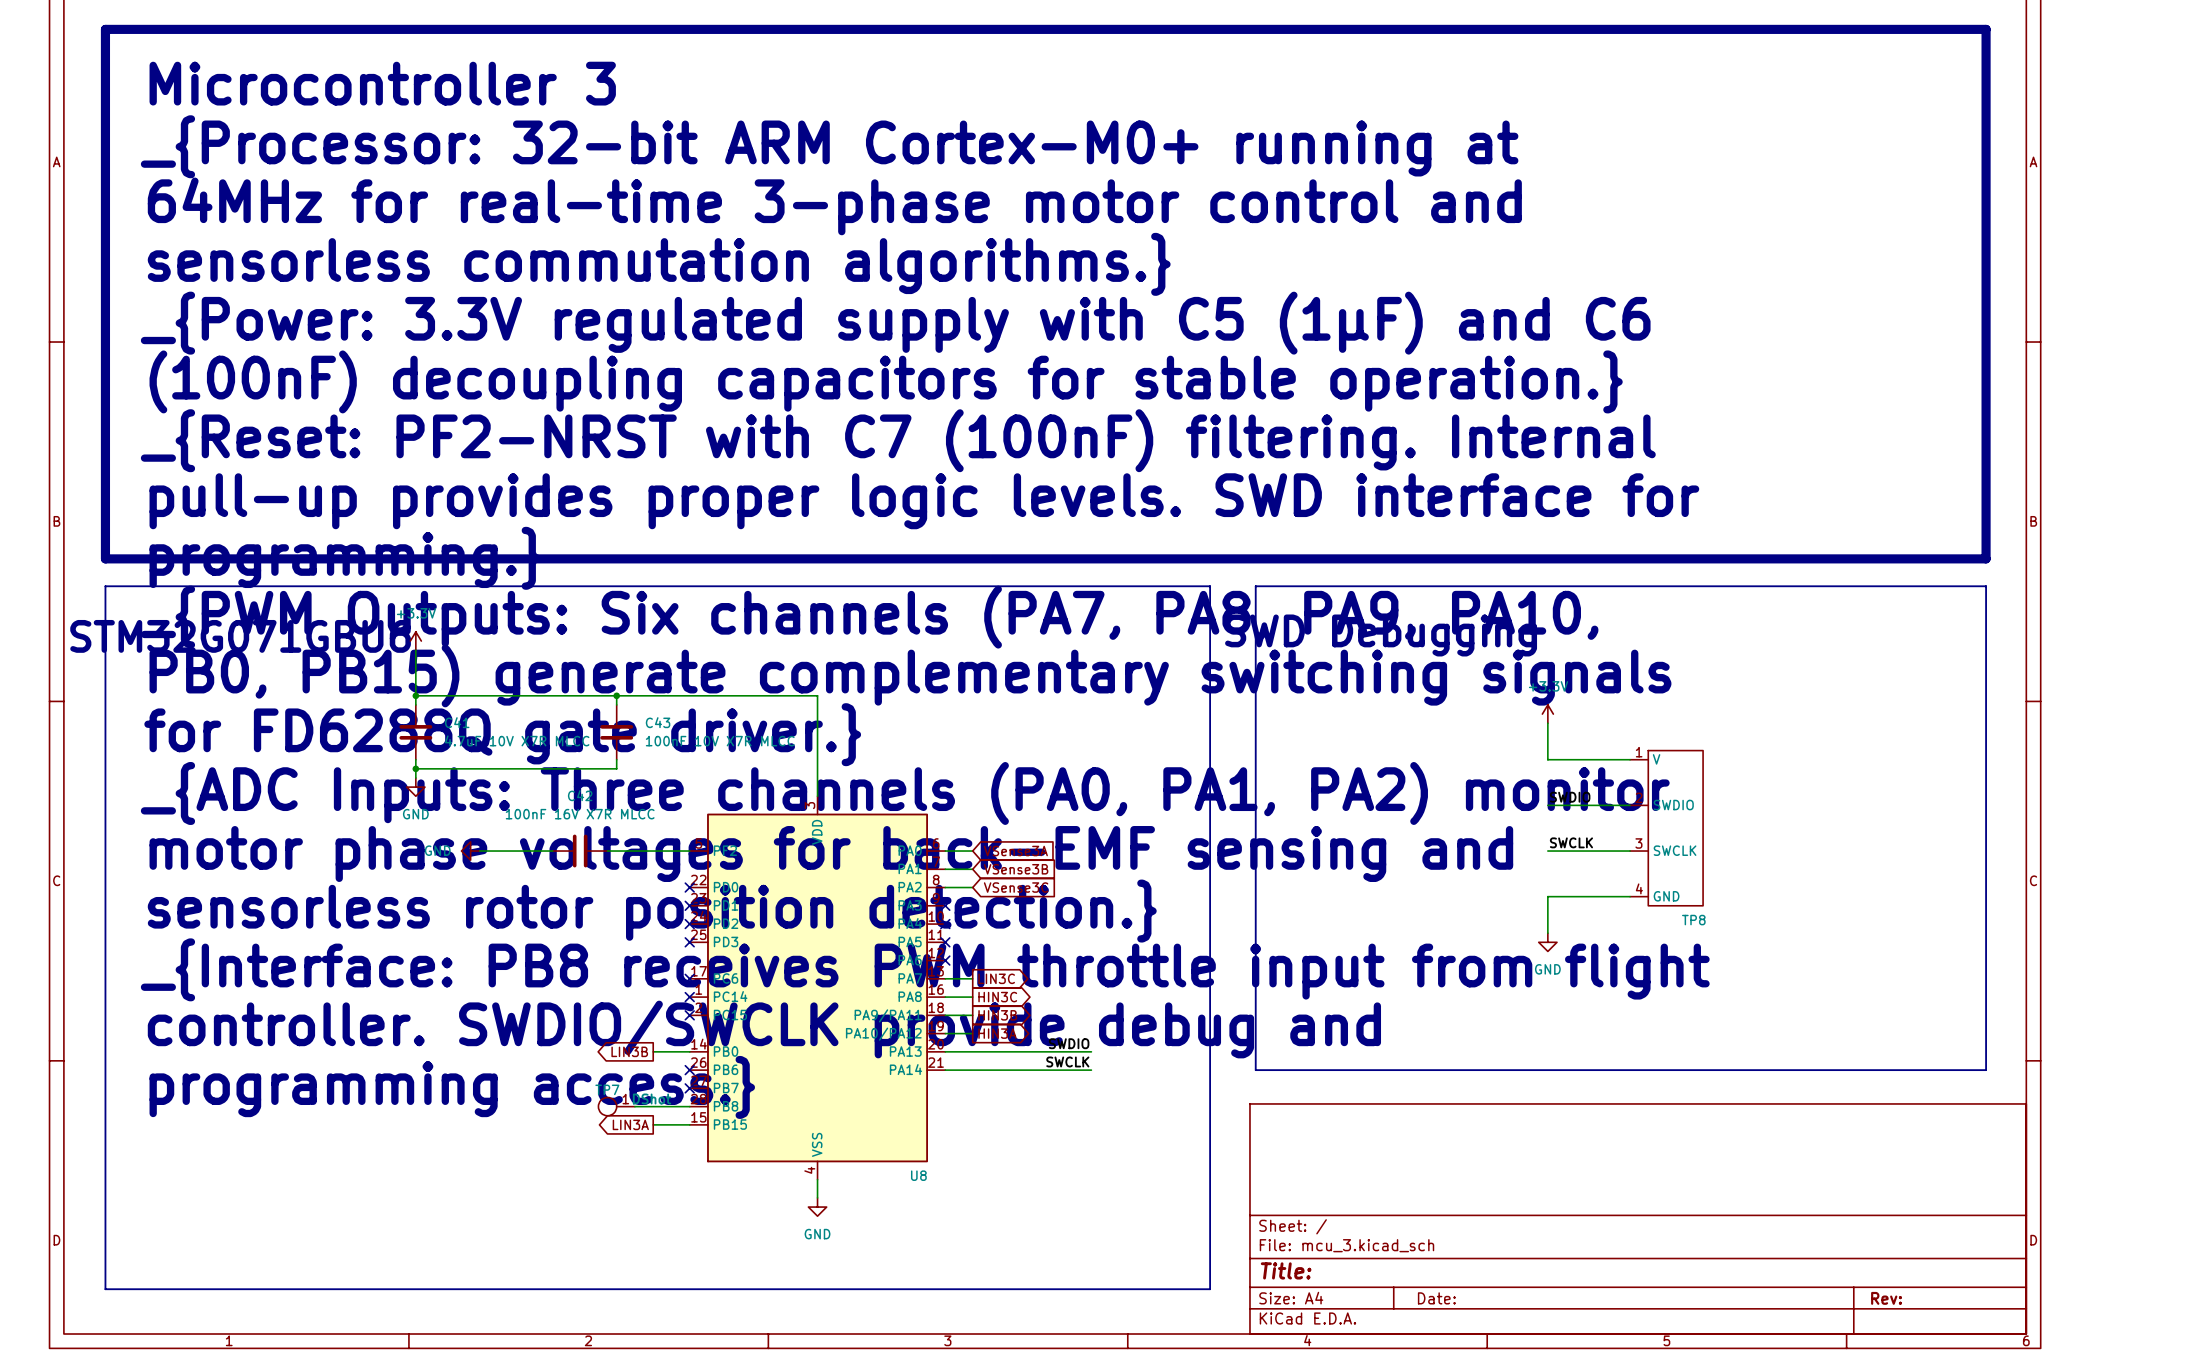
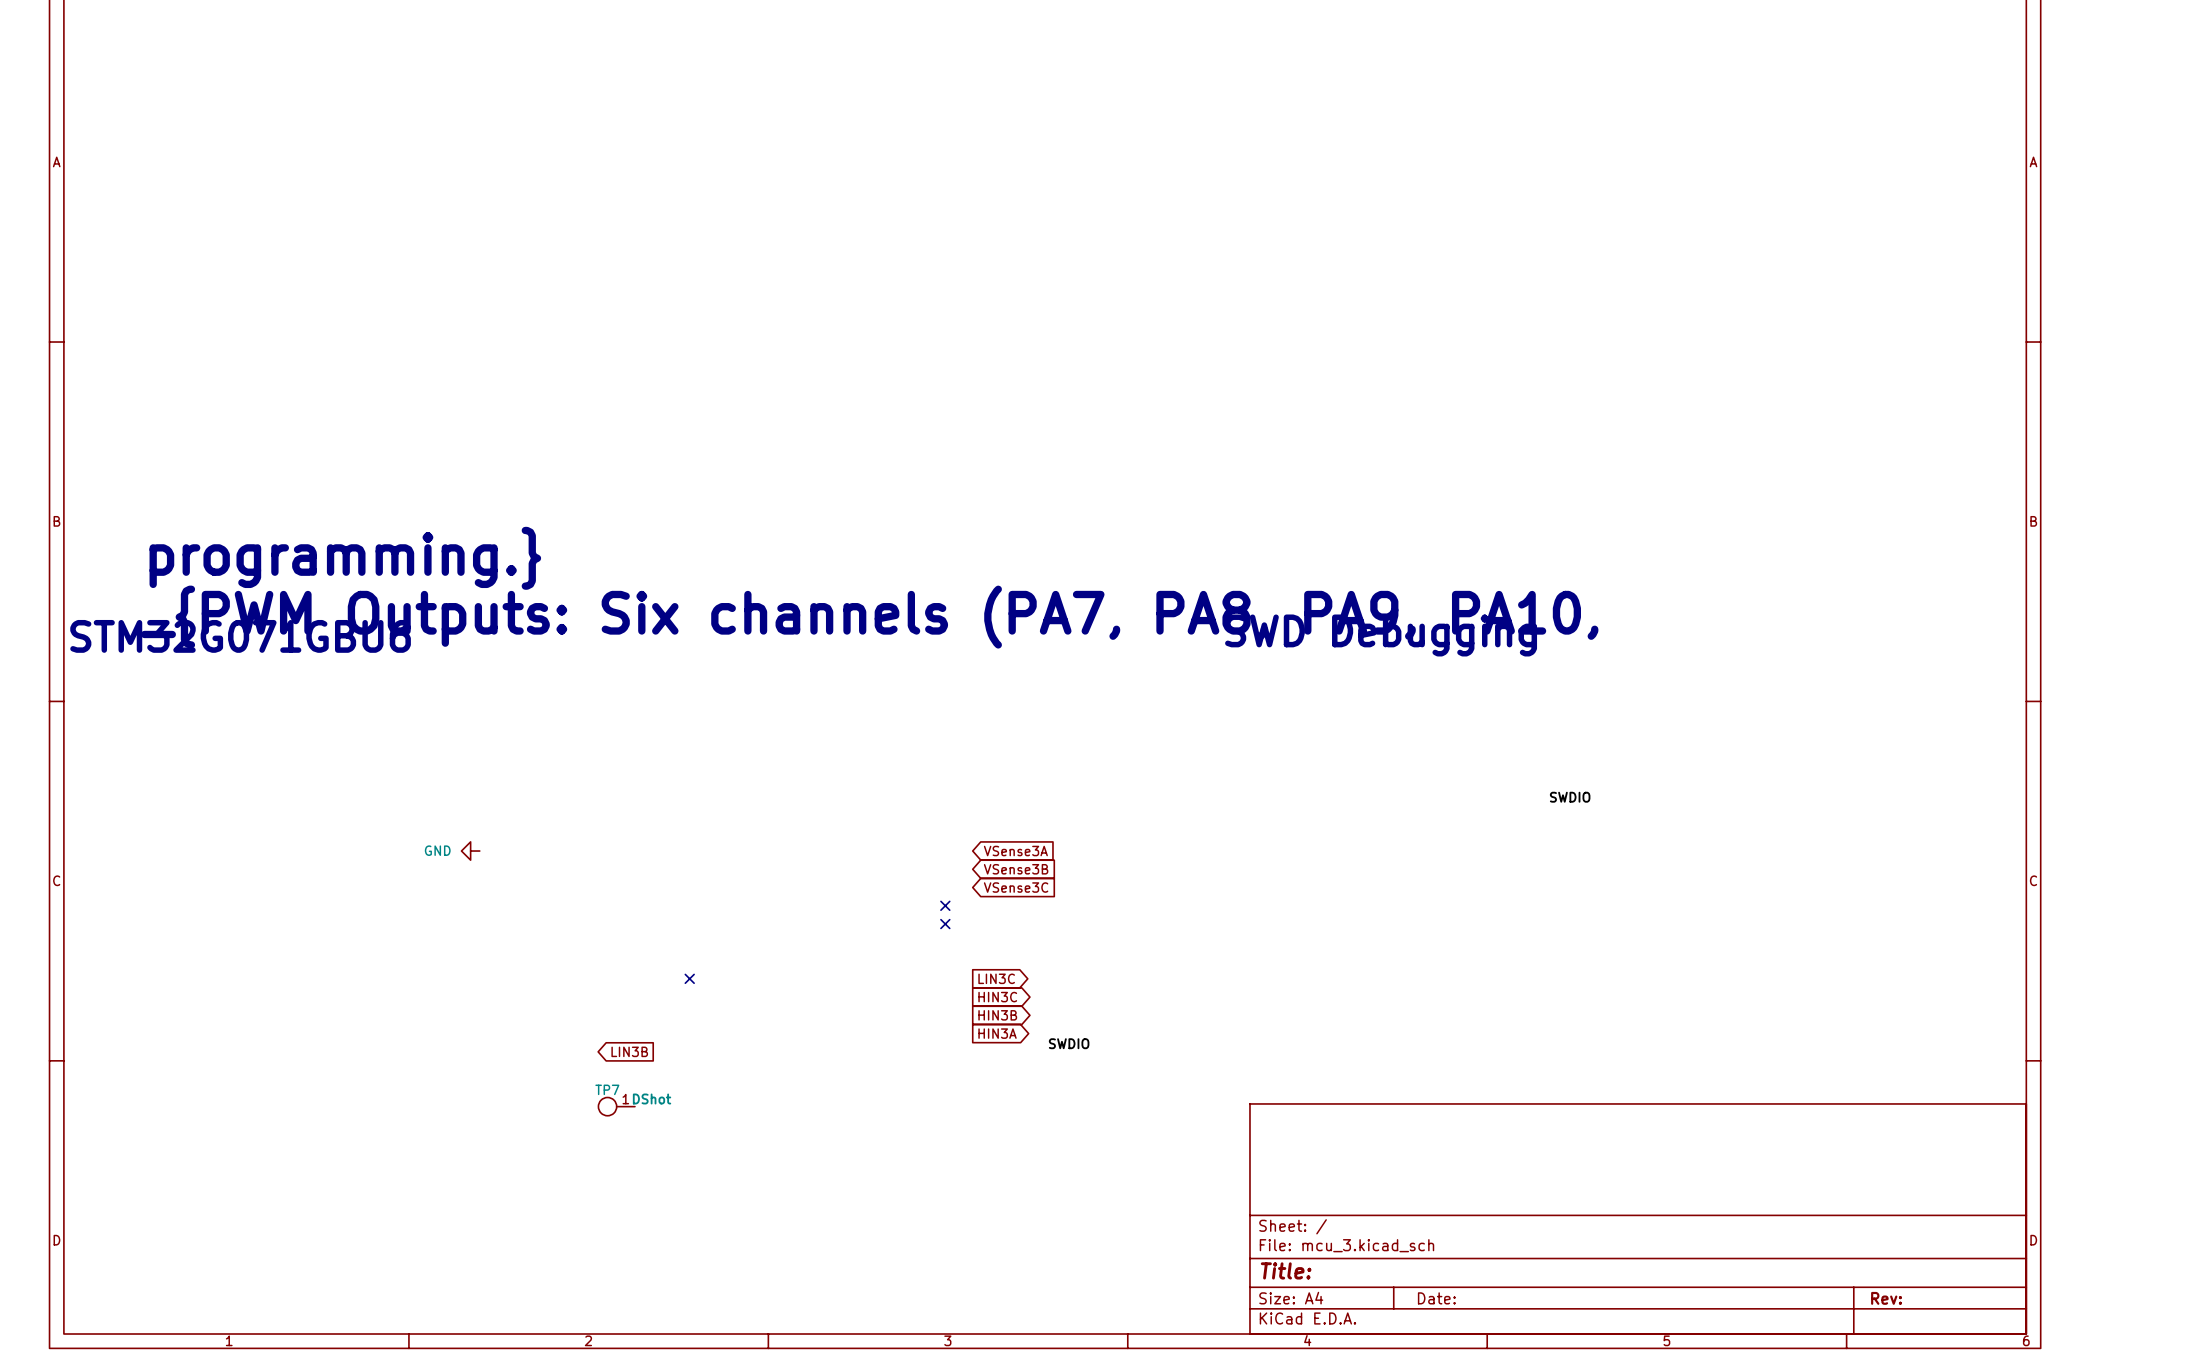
line: (105, 29) (1986, 29) (1986, 558) (105, 558) (105, 29) -> none
text: Microcontroller 3 (382, 83) -> none
text: _{Processor: 32-bit ARM Cortex-M0+ running at (829, 146) -> none
text: 64MHz for real-time 3-phase motor control and (834, 206) -> none
text: sensorless commutation algorithms.} (659, 264) -> none
text: _{Power: 3.3V regulated supply with C5 (1µF) and C6 (895, 323) -> none
text: (100nF) decoupling capacitors for stable operation.} (886, 381) -> none
text: _{Reset: PF2-NRST with C7 (100nF) filtering. Internal (898, 440) -> none
text: pull-up provides proper logic levels. SWD interface for (924, 501) -> none
line: (105, 586) (1210, 586) (1210, 1289) (105, 1289) (105, 586) -> none
line: (1255, 586) (1986, 586) (1986, 1070) (1255, 1070) (1255, 586) -> none
power symbol: +3.3V (415, 641) -> none
wire: (415, 650) (415, 704) -> none
text: PB0, PB15) generate complementary switching signals (910, 675) -> none
wire: (415, 695) (817, 695) (817, 796) -> none
junction: (415, 695) -> none
wire: (616, 695) (616, 704) -> none
junction: (616, 695) -> none
power symbol: +3.3V (1547, 714) -> none
wire: (1547, 723) (1547, 759) (1630, 759) -> none
C41: 4.7uF 10V X7R MLCC (415, 732) -> none
C43: 100nF 10V X7R MLCC (616, 732) -> none
text: for FD6288Q gate driver.} (502, 734) -> none
wire: (415, 759) (415, 777) -> none
wire: (616, 759) (616, 768) (415, 768) -> none
junction: (415, 768) -> none
power symbol: GND (415, 787) -> none
text: _{ADC Inputs: Three channels (PA0, PA1, PA2) monitor (905, 793) -> none
wire: (1547, 805) (1630, 805) -> none
TP8: (1666, 828) -> none
label: SWCLK (1571, 842) -> none
wire: (479, 851) (552, 851) -> none
C42: 100nF 16V X7R MLCC (580, 851) -> none
wire: (607, 851) (689, 851) -> none
wire: (945, 851) (972, 851) -> none
wire: (1547, 851) (1630, 851) -> none
text: motor phase voltages for back-EMF sensing and (831, 854) -> none
wire: (945, 869) (972, 869) -> none
no-connect mark: (689, 887) -> none
wire: (945, 887) (972, 887) -> none
wire: (1630, 896) (1547, 896) (1547, 933) -> none
no-connect mark: (689, 905) -> none
text: sensorless rotor position detection.} (652, 911) -> none
no-connect mark: (689, 924) -> none
no-connect mark: (689, 942) -> none
no-connect mark: (945, 942) -> none
power symbol: GND (1547, 942) -> none
no-connect mark: (945, 960) -> none
text: _{Interface: PB8 receives PWM throttle input from flight (925, 969) -> none
wire: (945, 978) (972, 978) -> none
U8: (817, 987) -> none
no-connect mark: (689, 997) -> none
wire: (945, 997) (972, 997) -> none
no-connect mark: (689, 1015) -> none
wire: (945, 1015) (972, 1015) -> none
text: controller. SWDIO/SWCLK provide debug and (764, 1029) -> none
wire: (945, 1033) (972, 1033) -> none
wire: (653, 1051) (689, 1051) -> none
wire: (945, 1051) (1091, 1051) -> none
label: SWCLK (1067, 1061) -> none
no-connect mark: (689, 1070) -> none
wire: (945, 1070) (1091, 1070) -> none
text: programming access.} (452, 1087) -> none
no-connect mark: (689, 1088) -> none
wire: (634, 1106) (689, 1106) -> none
global label: LIN3A (630, 1124) -> none
wire: (653, 1124) (689, 1124) -> none
wire: (817, 1179) (817, 1197) -> none
power symbol: GND (817, 1207) -> none

